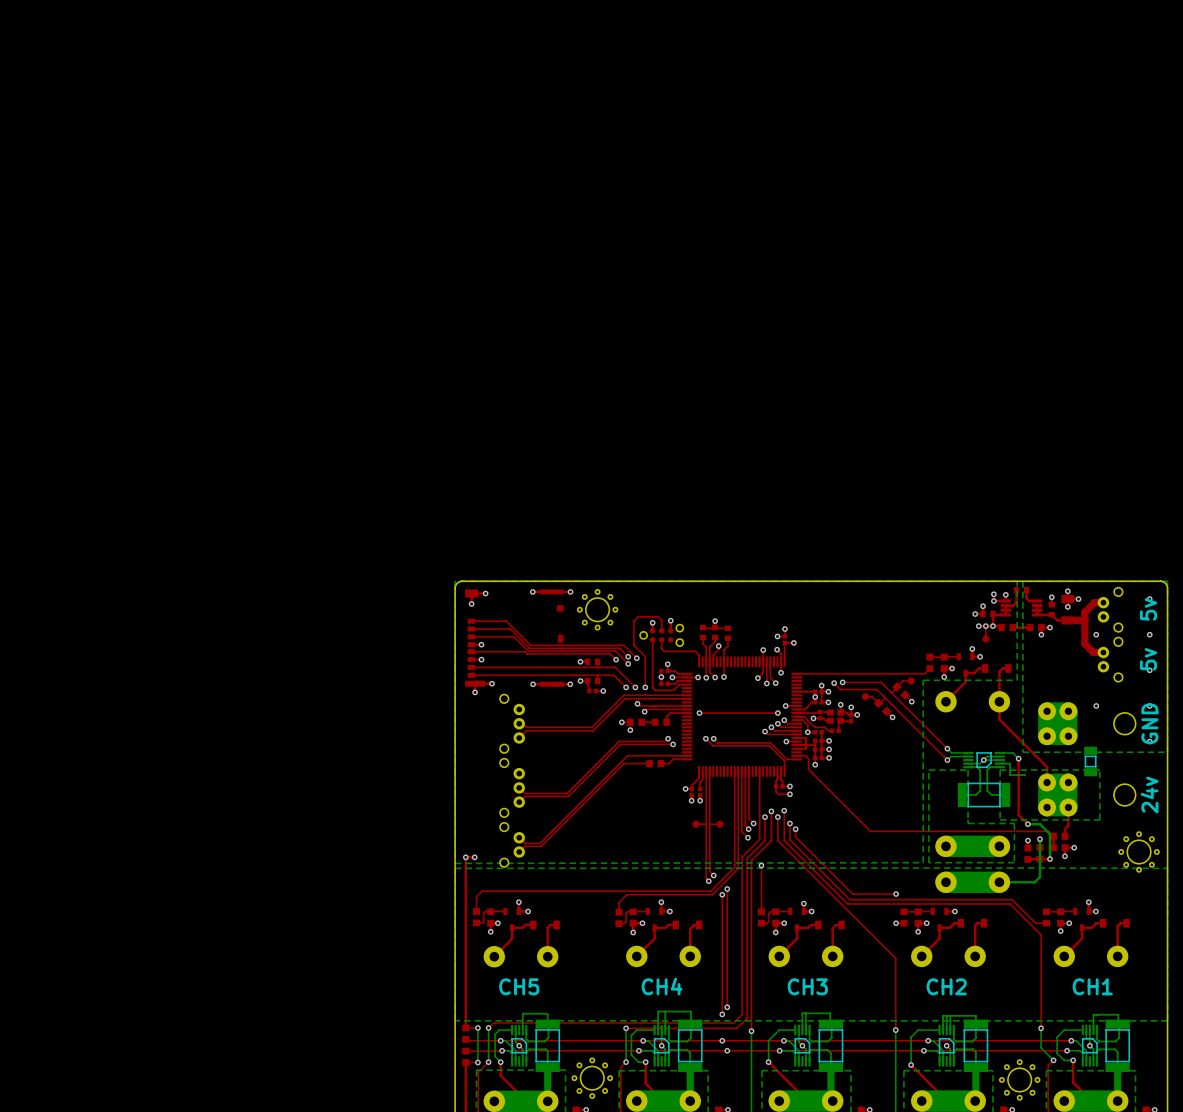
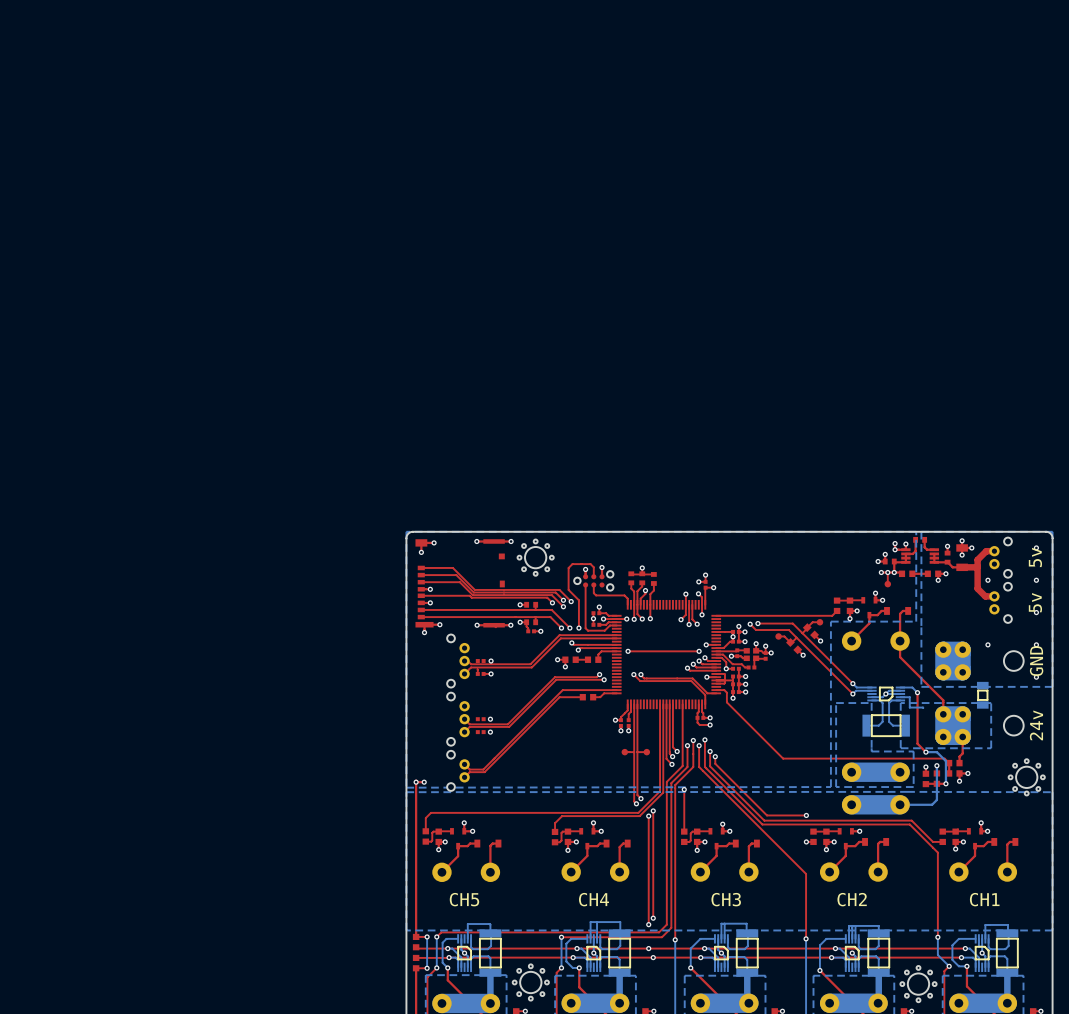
part: none -> (480, 661)
via: none -> (491, 661)
top track: none -> (477, 669) (477, 673)
part: none -> (480, 673)
top track: none -> (491, 673) (483, 673)
via: none -> (491, 673)
part: none -> (480, 719)
via: none -> (490, 719)
part: none -> (480, 732)
via: none -> (490, 732)

